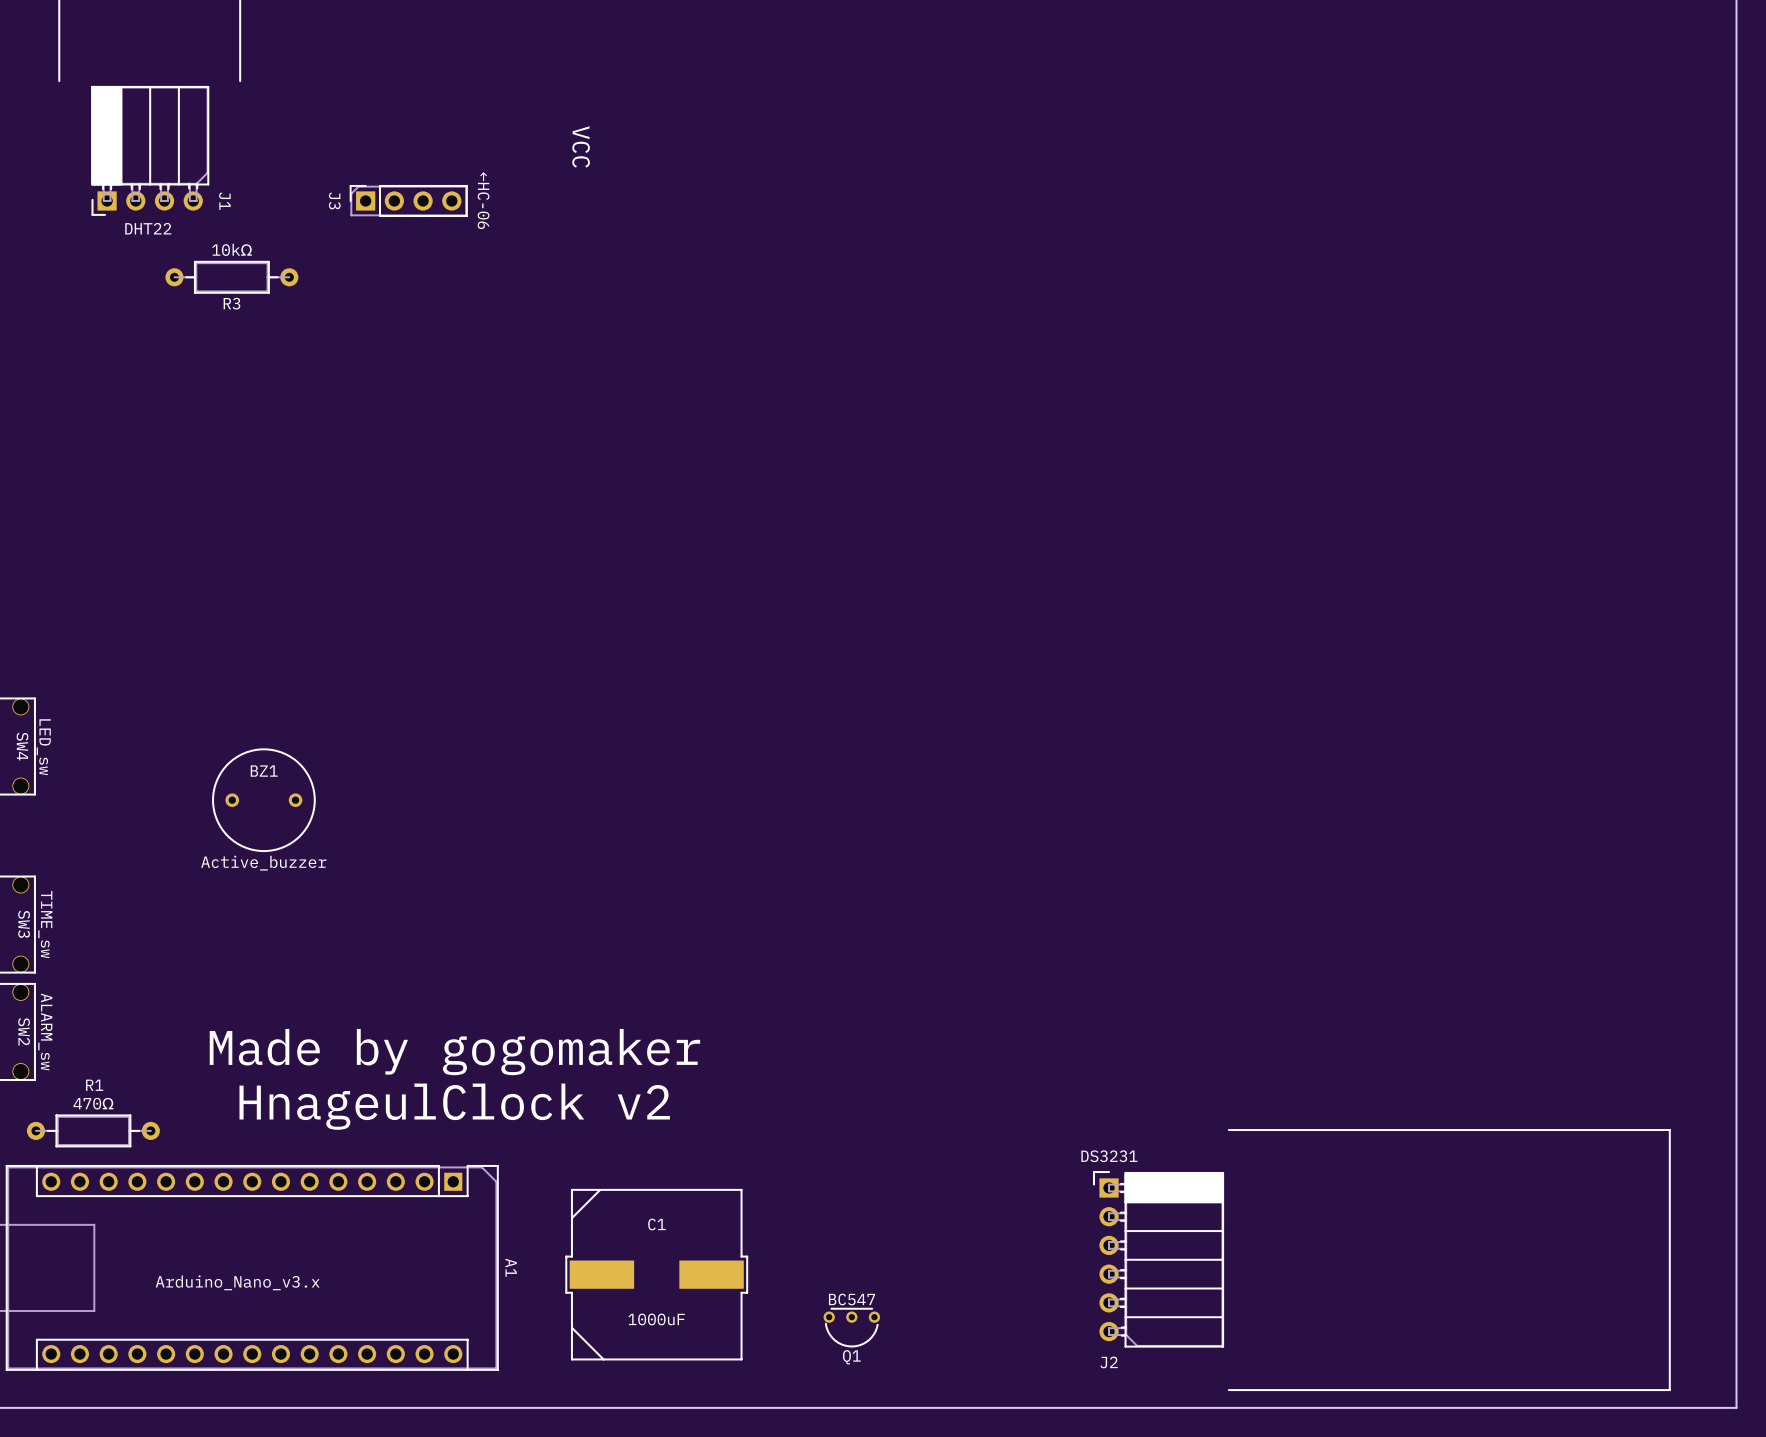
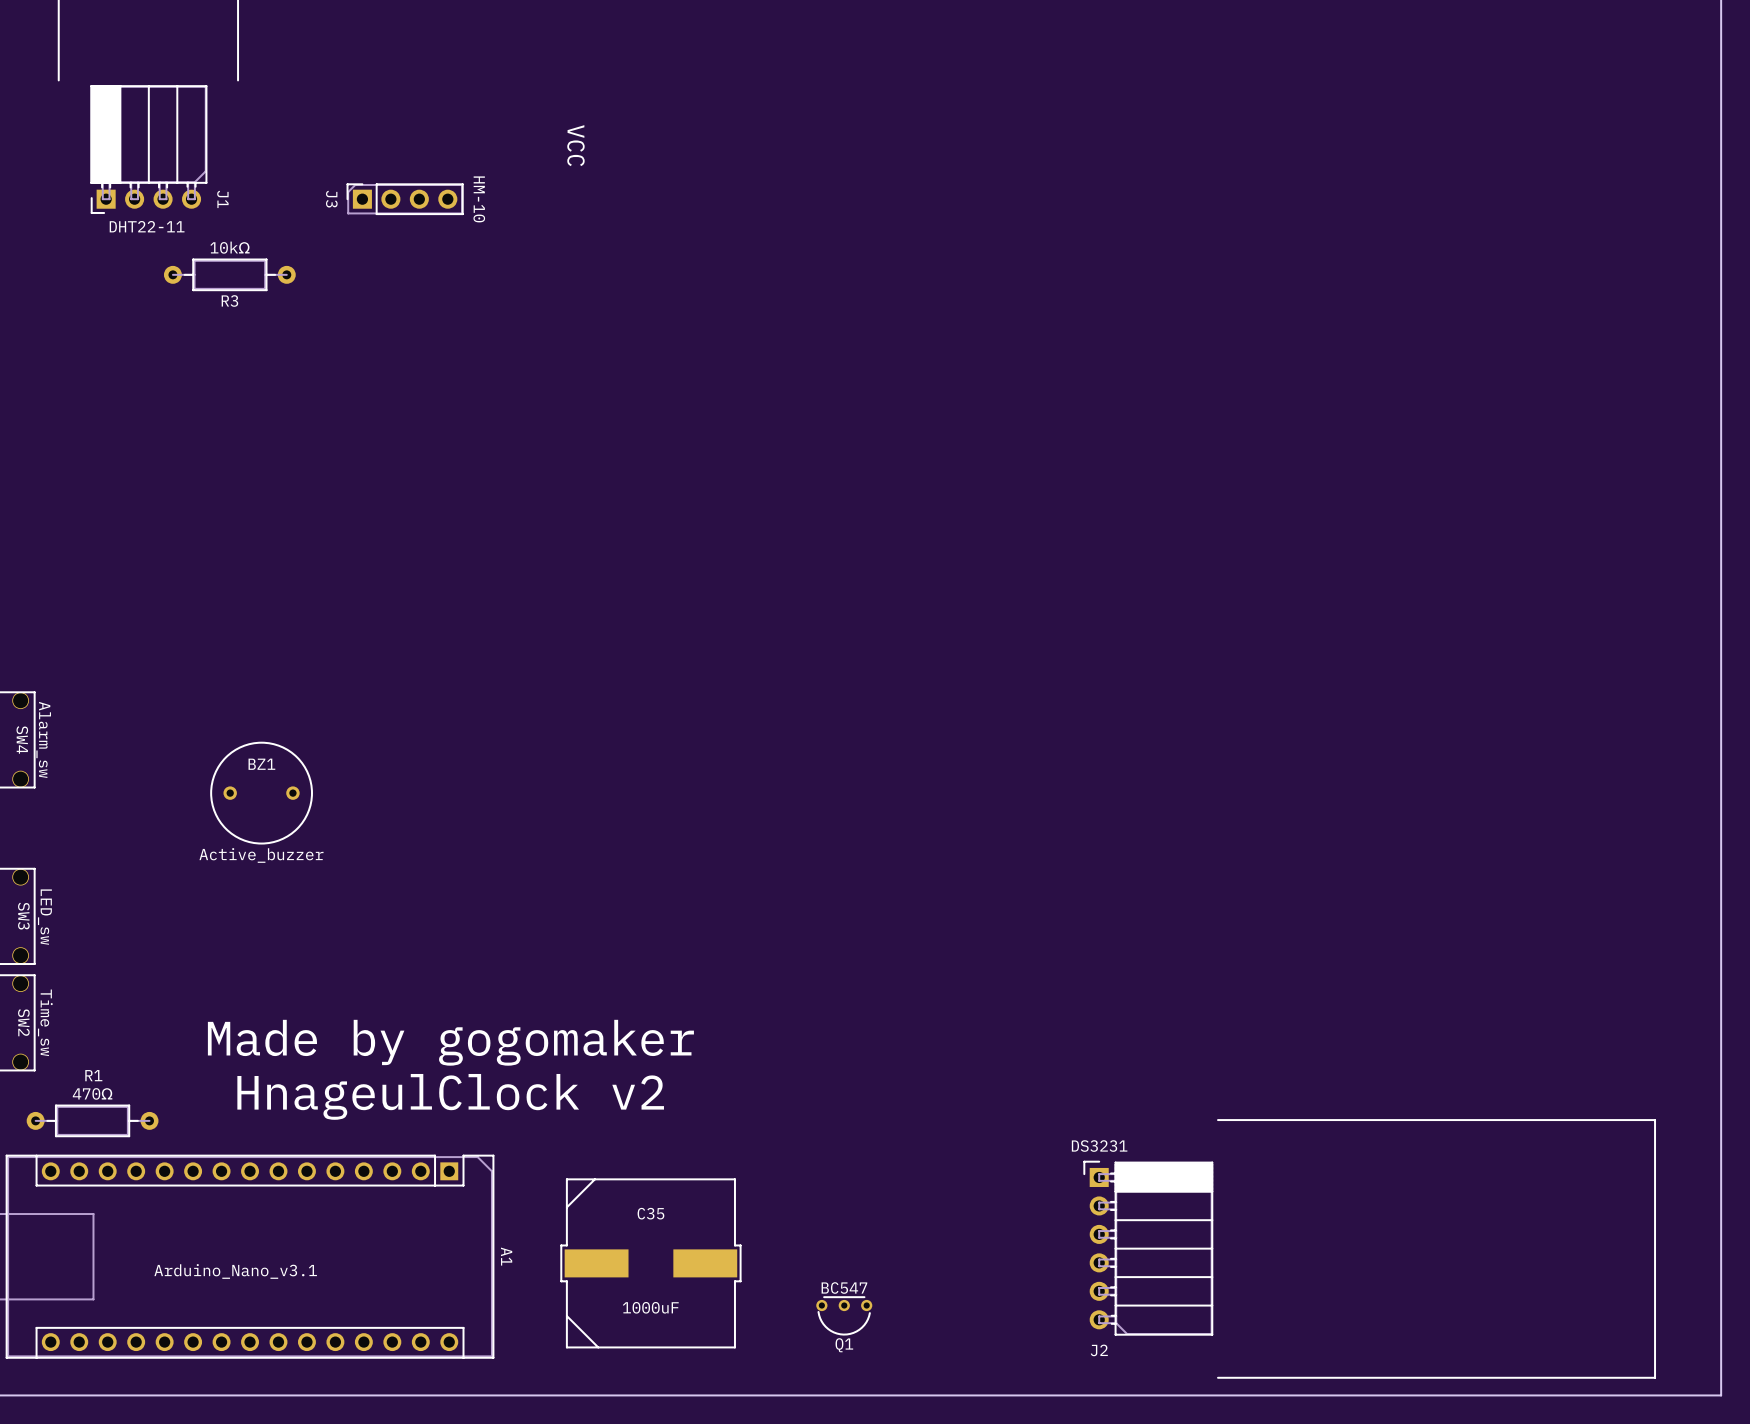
J3 value: ←HC-06 (483, 200) -> HM-10 (479, 199)
J1 value: DHT22 (148, 228) -> DHT22-11 (147, 226)
SW4 value: LED_sw (43, 747) -> Alarm_sw (43, 739)
SW3 value: TIME_sw (45, 924) -> LED_sw (44, 917)
SW2 value: ALARM_sw (45, 1031) -> Time_sw (45, 1022)
C1 name: C1 (656, 1224) -> C35 (650, 1213)
A1 value: Arduino_Nano_v3.x (237, 1282) -> Arduino_Nano_v3.1 (235, 1271)

